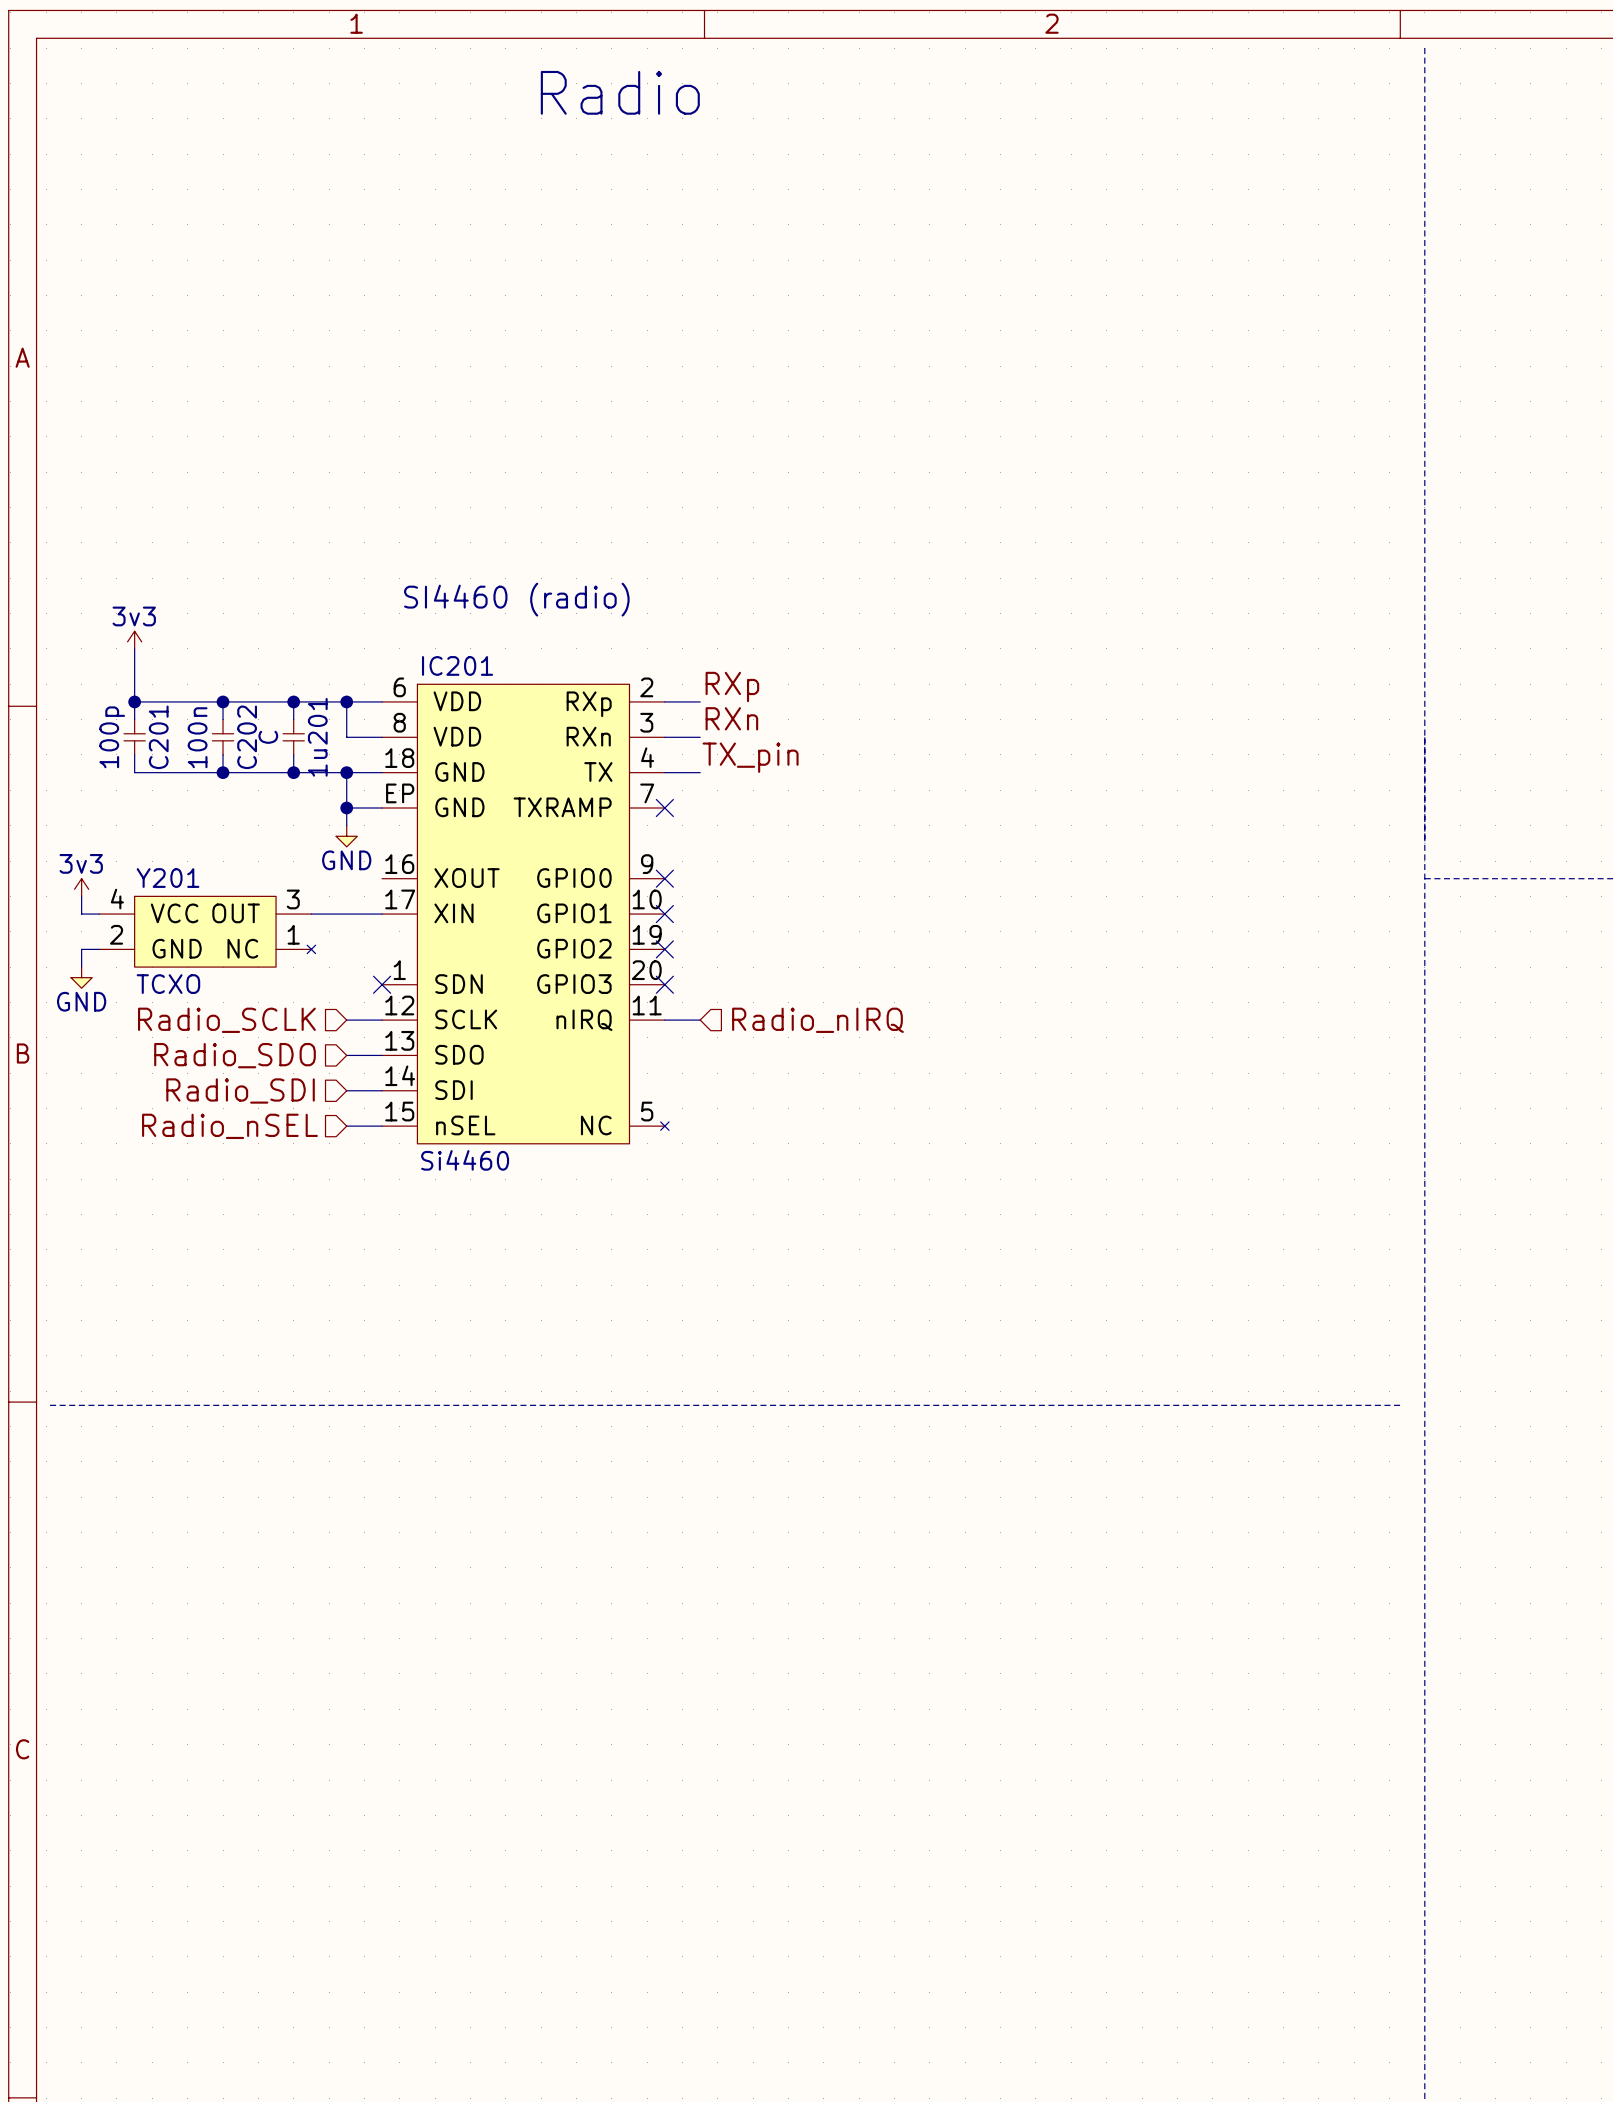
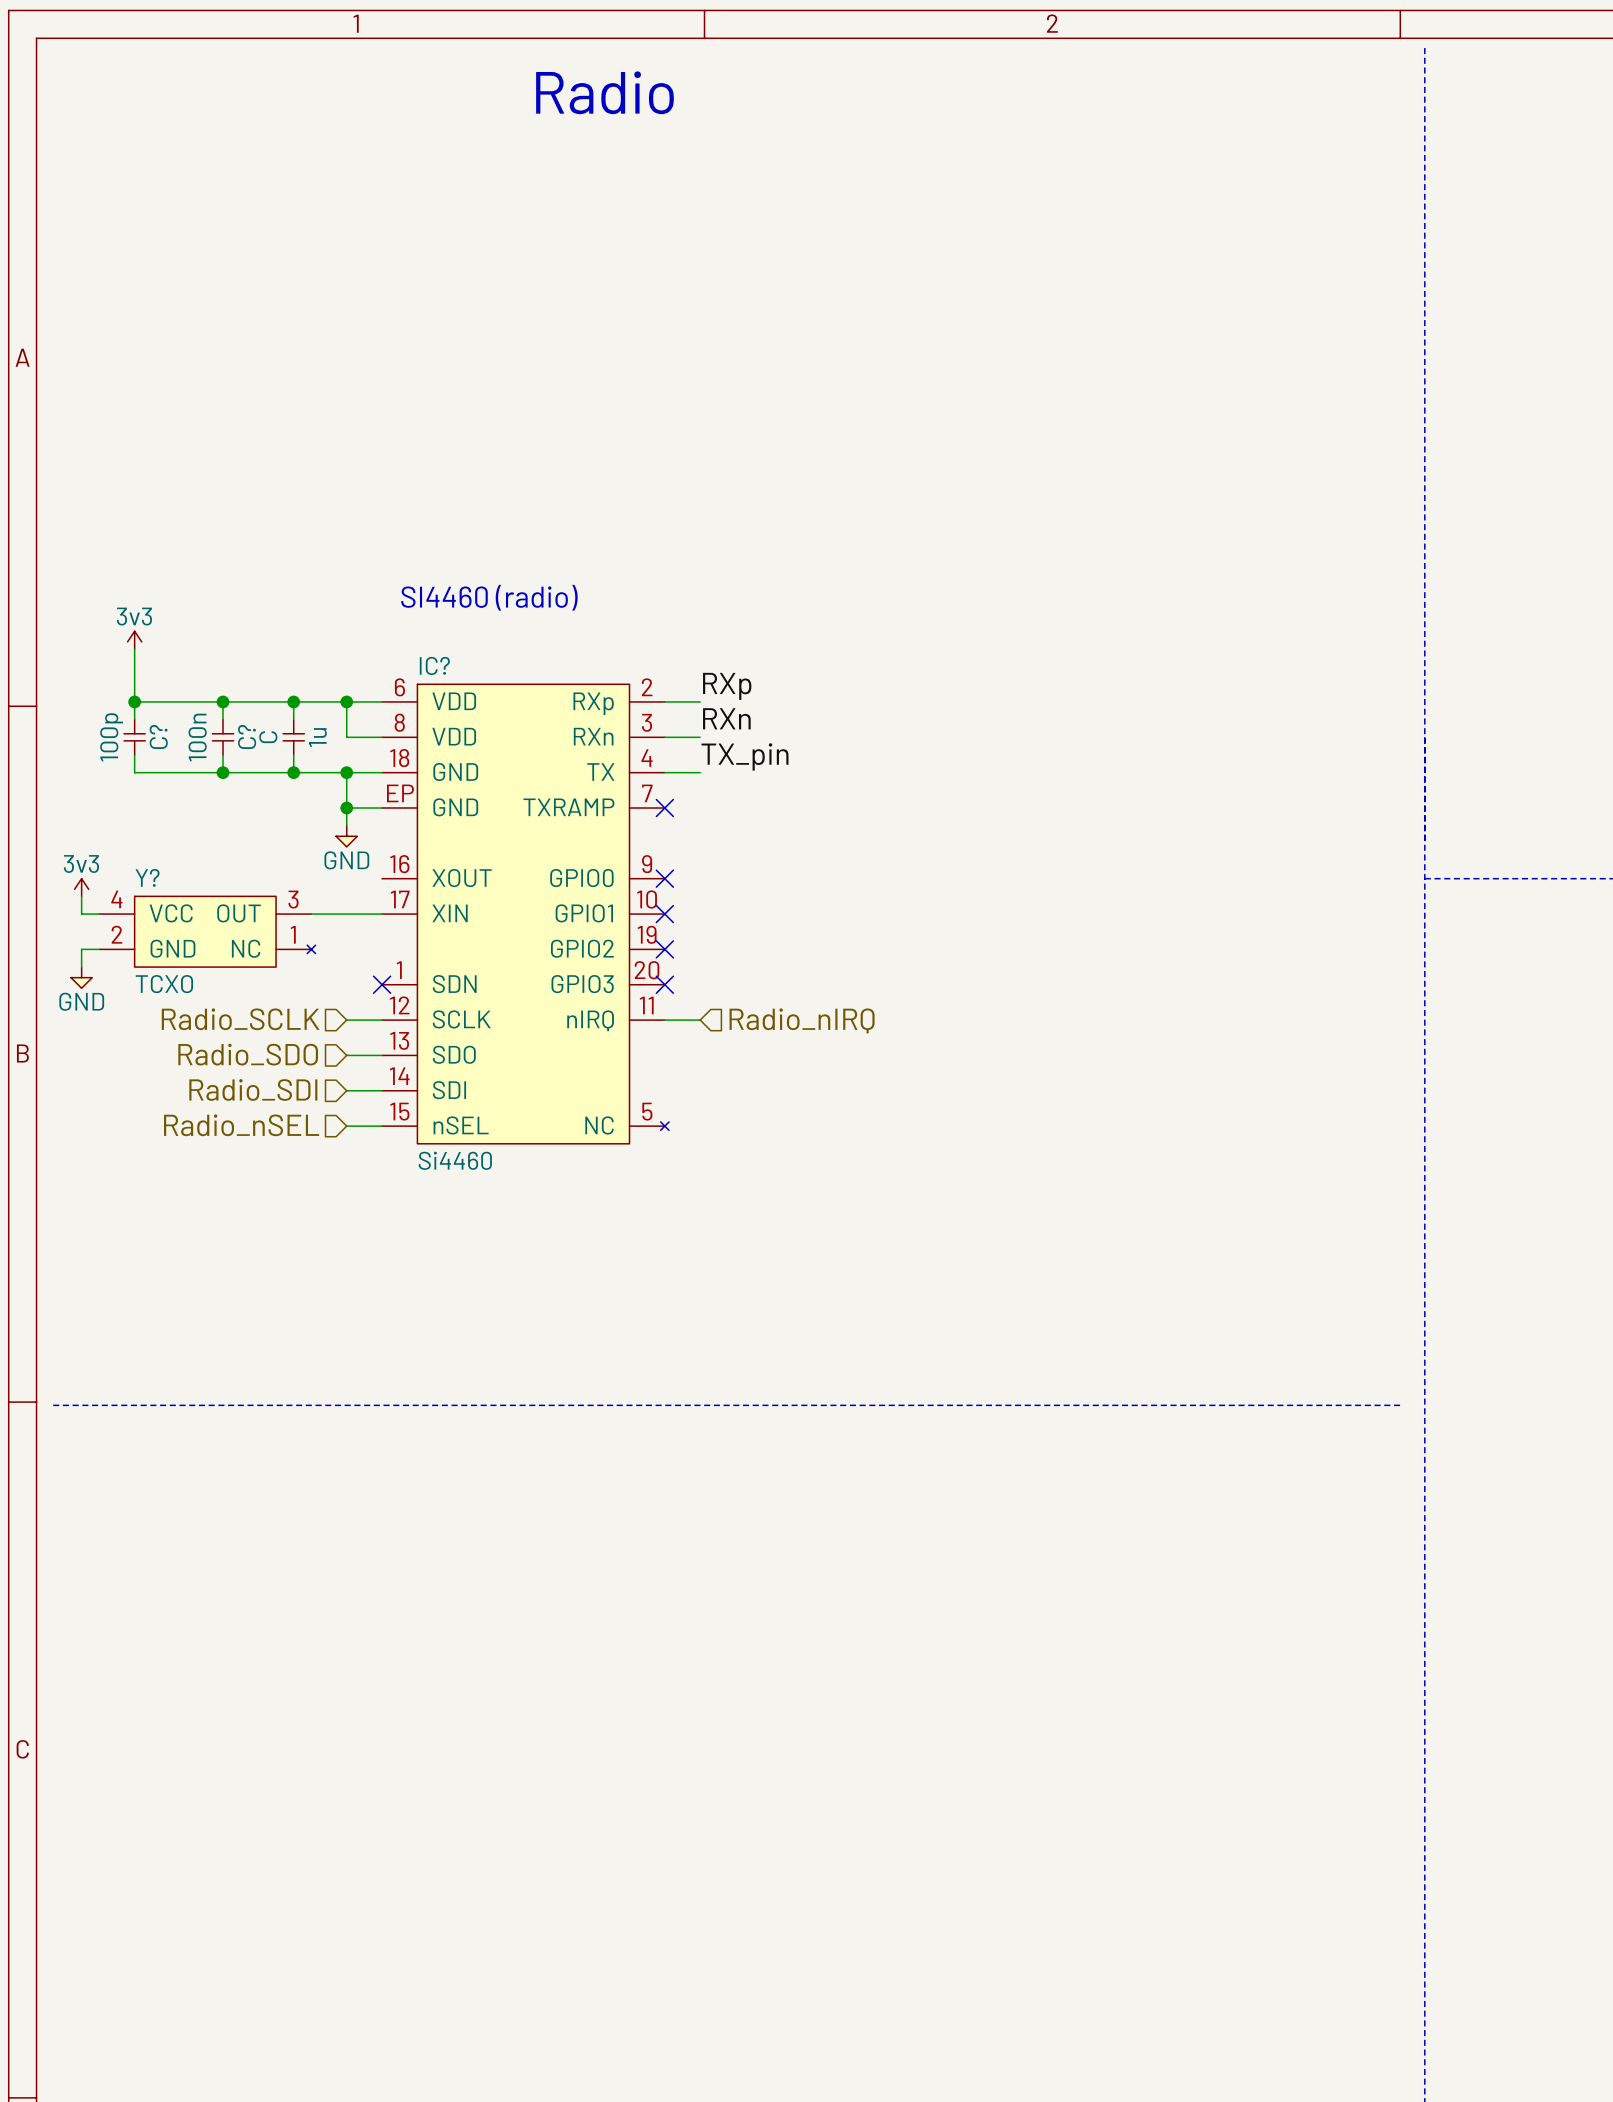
IC201 name: IC201 (457, 665) -> IC? (434, 665)
C201 name: C201 (158, 737) -> C? (158, 736)
C202 name: C202 (247, 737) -> C? (247, 736)
1u201 name: 1u201 (317, 737) -> 1u (317, 737)
Y201 name: Y201 (168, 878) -> Y? (147, 877)

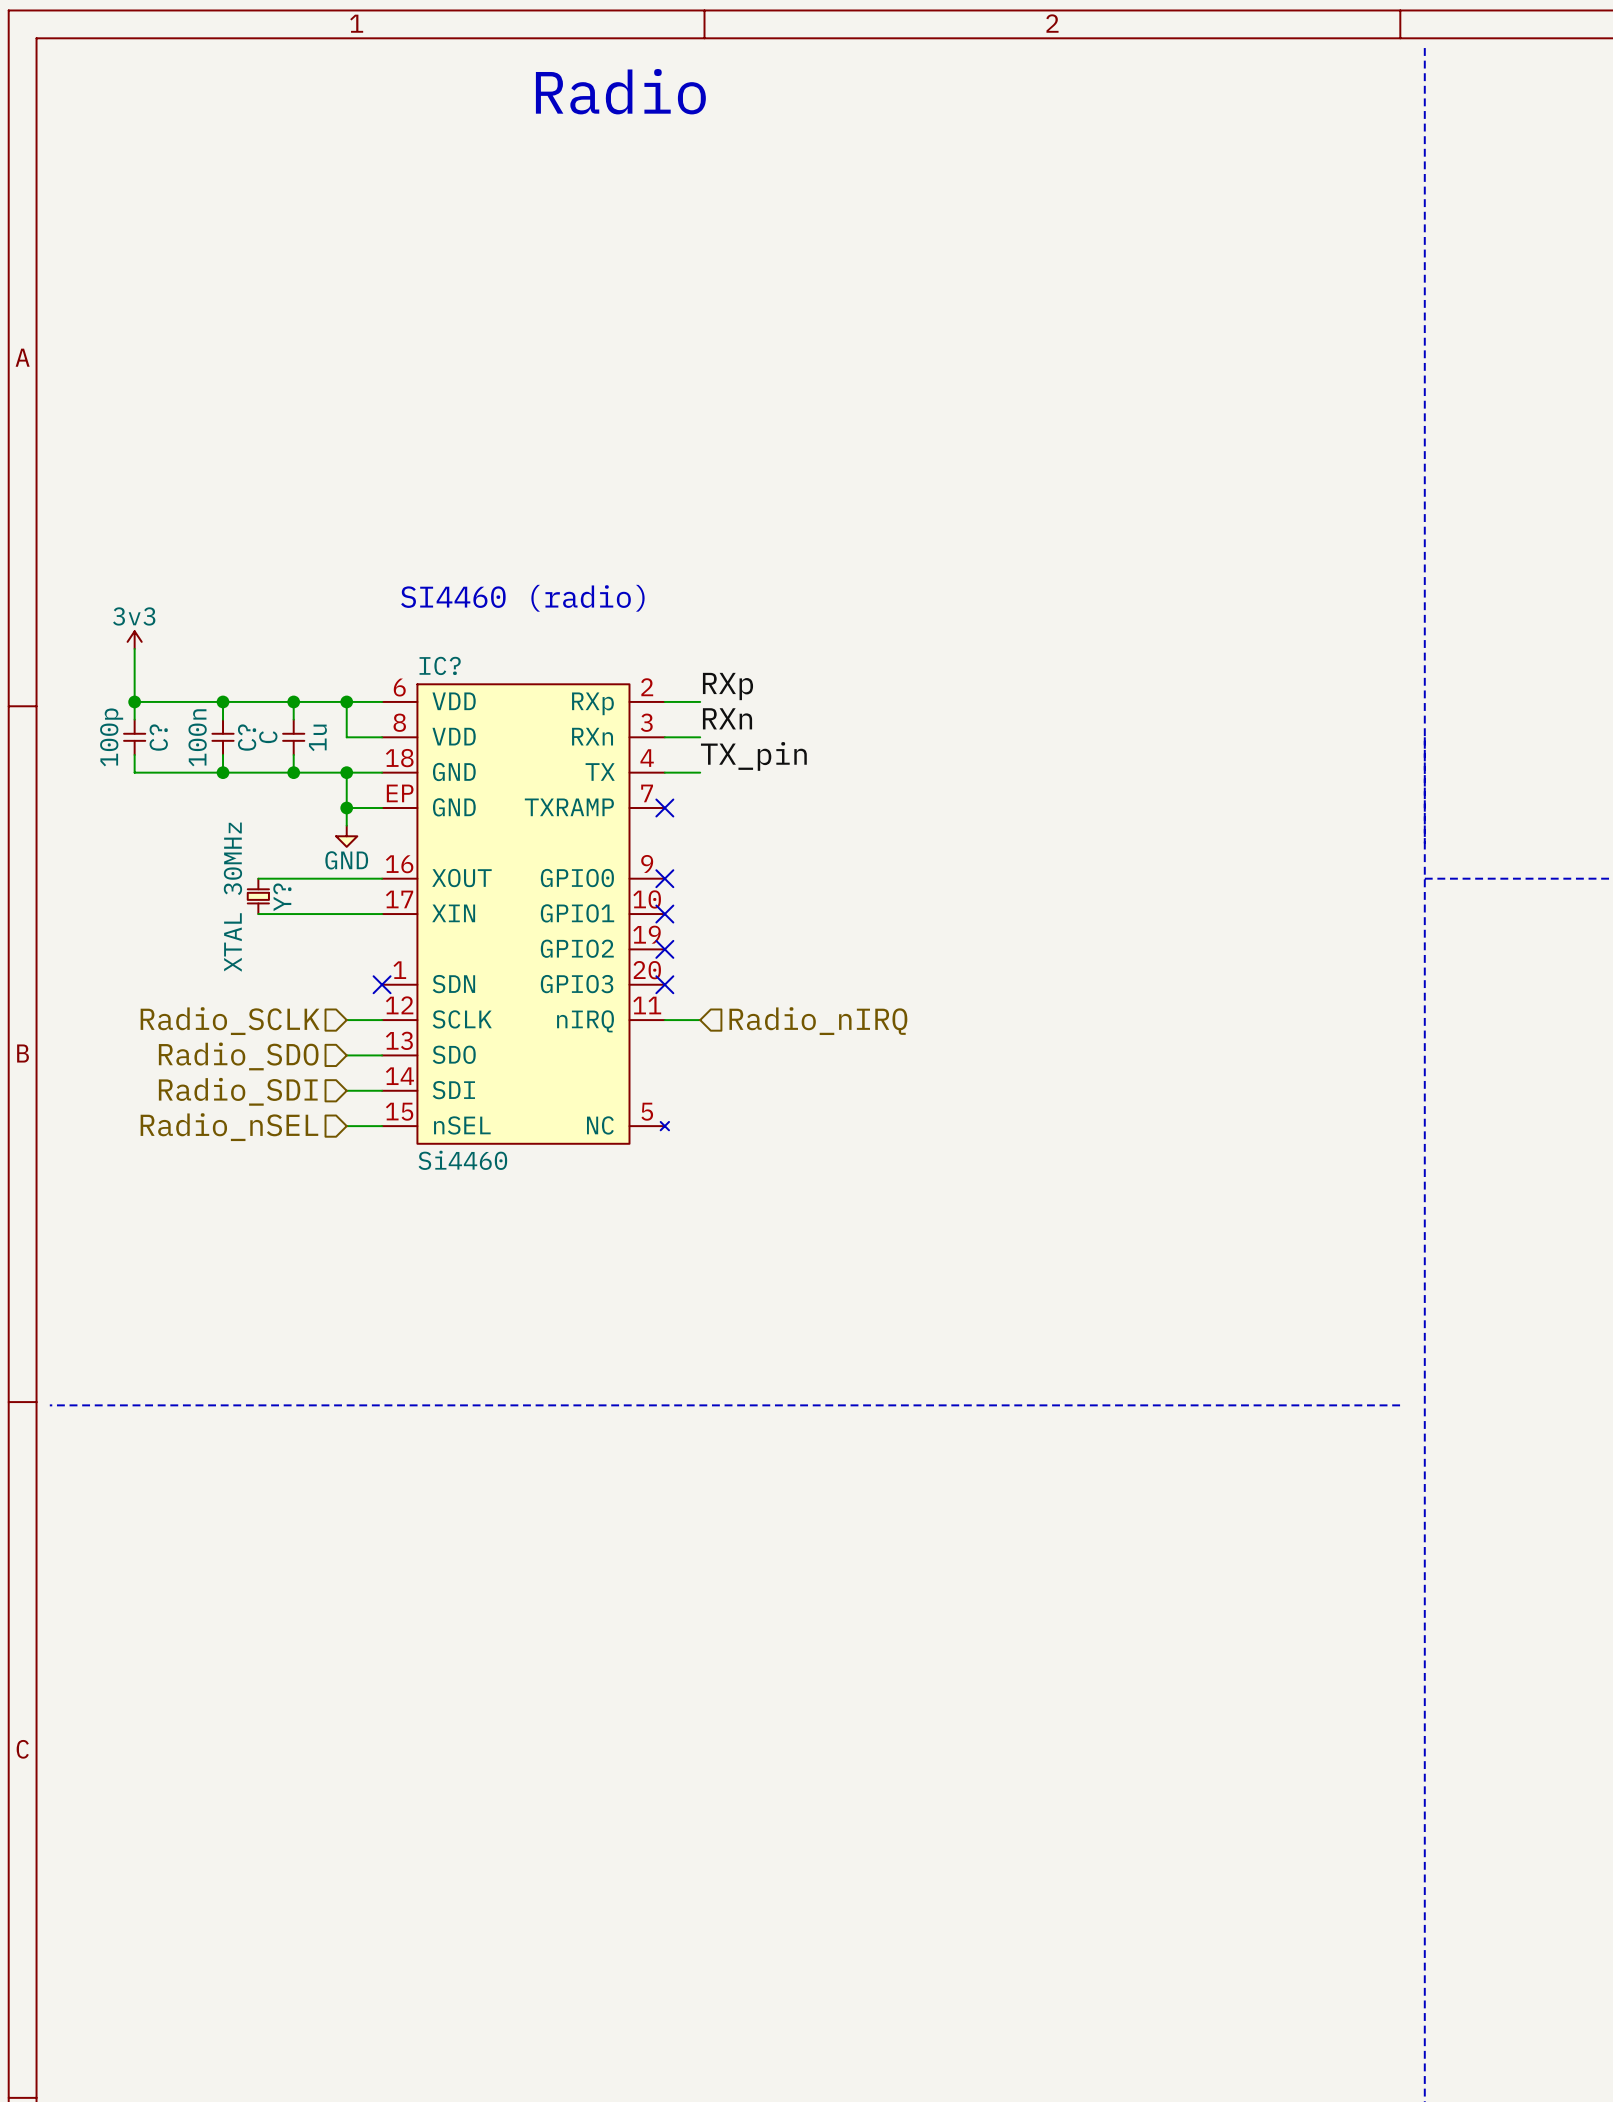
wire: none -> (258, 878) (382, 878)
power symbol: 3v3 (81, 887) -> none
wire: (81, 896) (81, 914) (99, 914) -> none
Y?: none -> XTAL 30MHz (258, 896)
Y?: TCXO (207, 931) -> none
wire: (99, 949) (81, 949) (81, 967) -> none
power symbol: GND (81, 977) -> none

